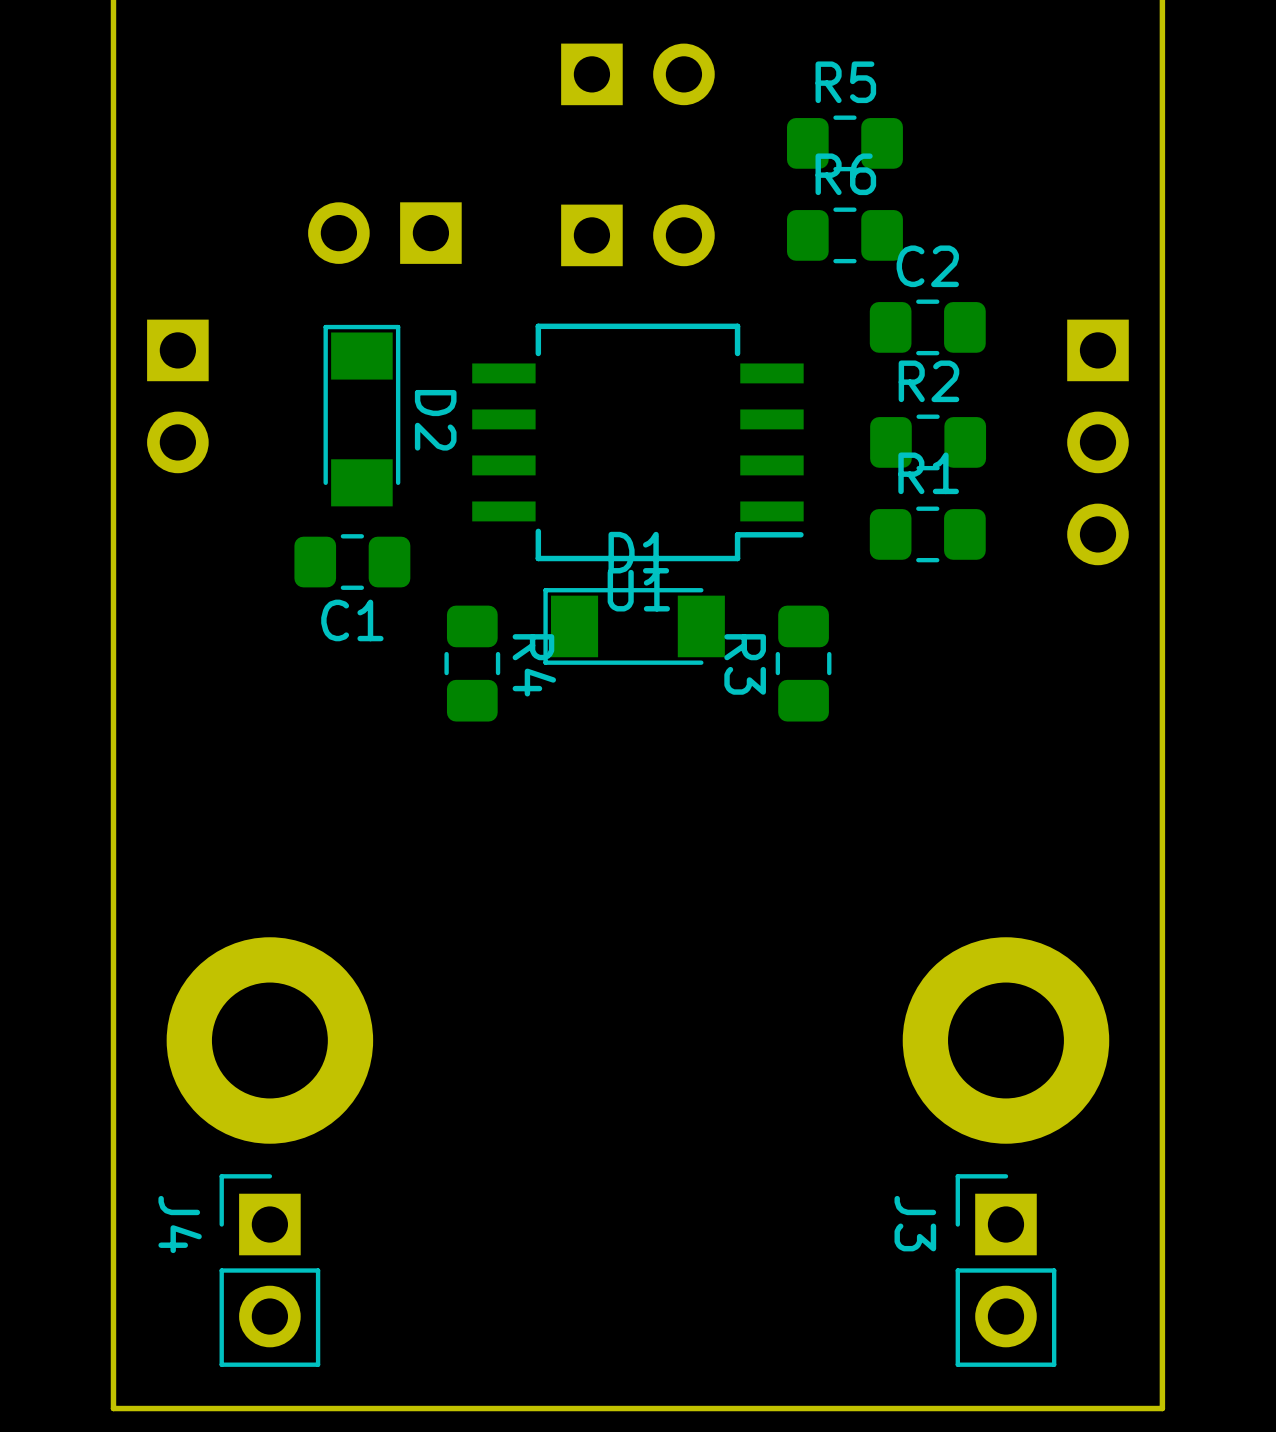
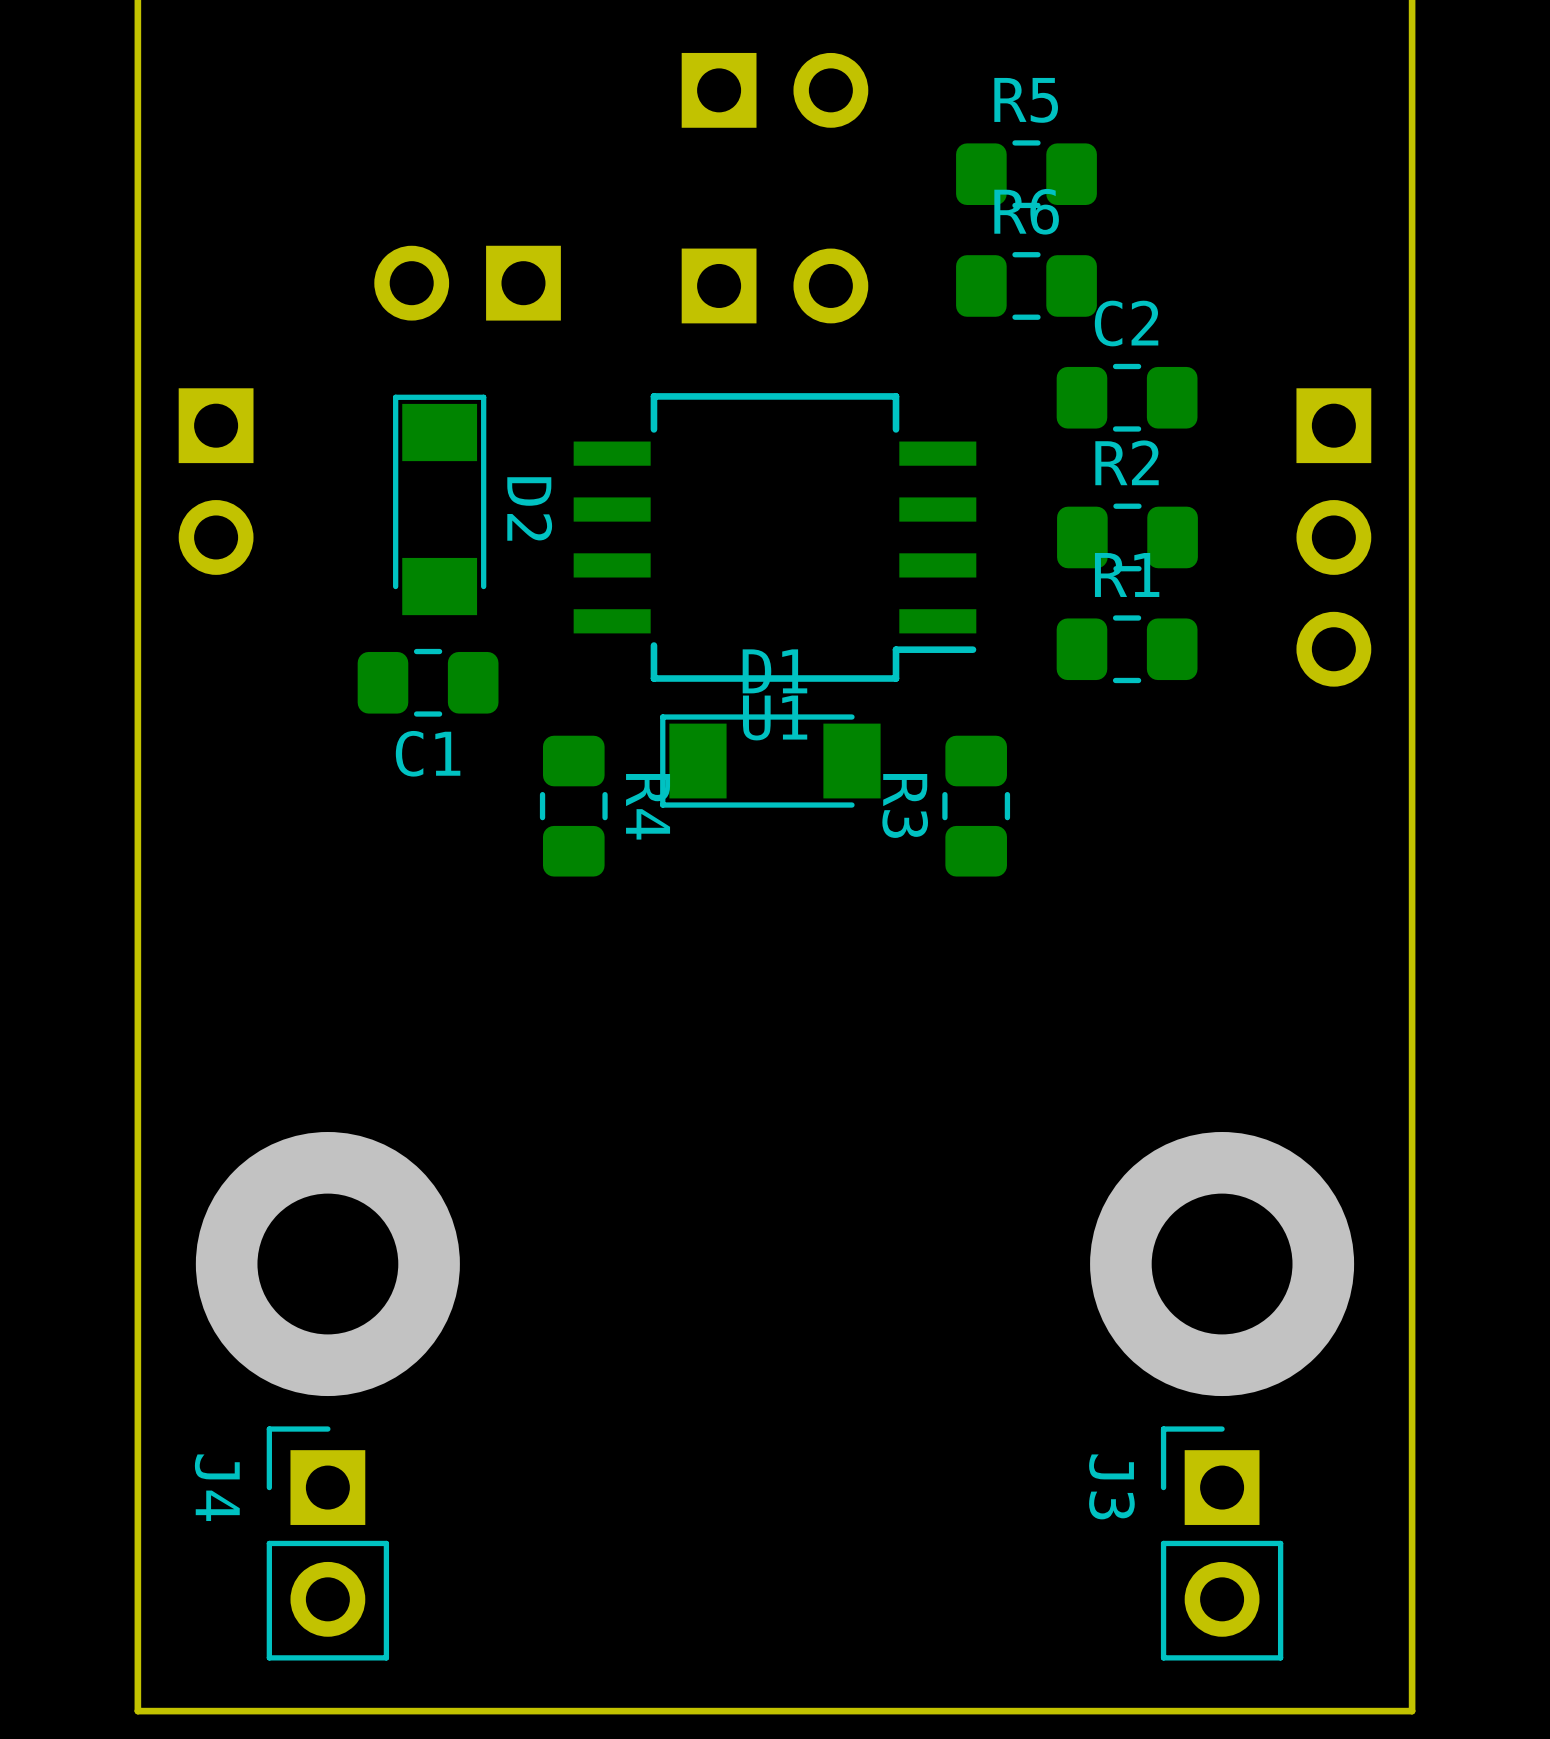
part: (269, 1040) -> none
via: none -> (327, 1264)
part: (1005, 1040) -> none
via: none -> (1222, 1264)

